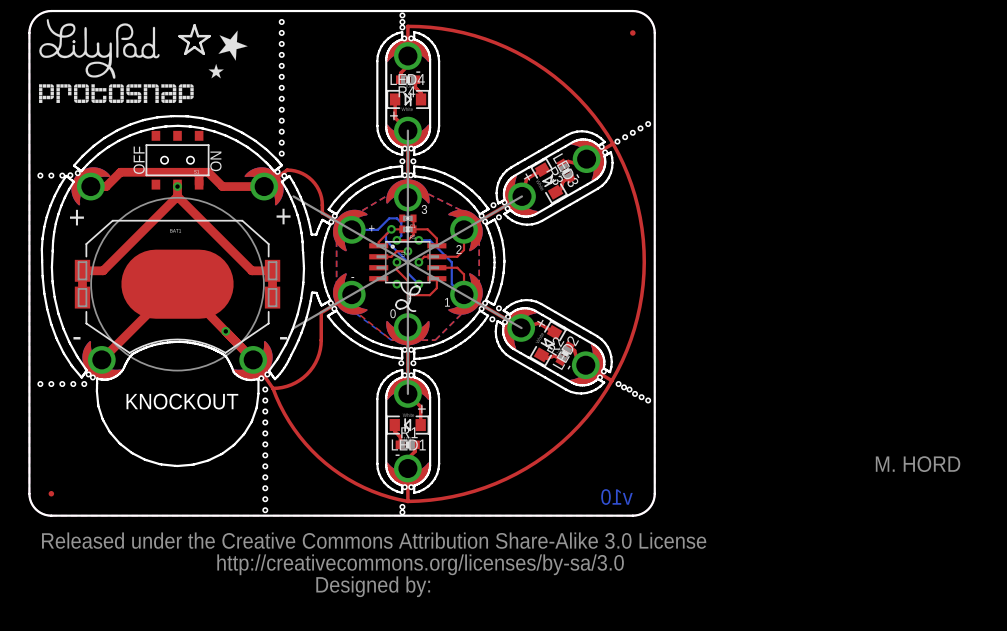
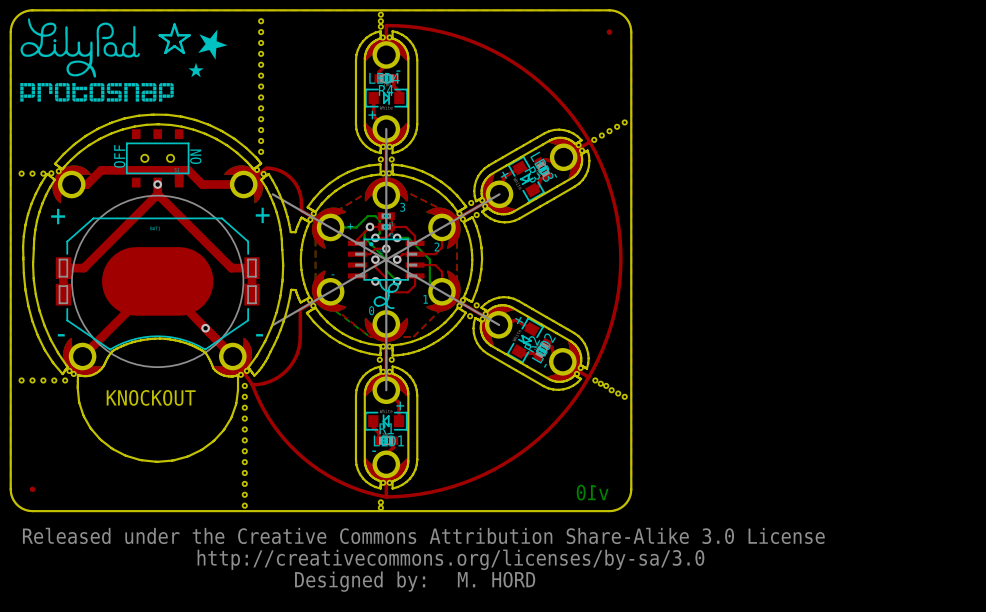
text: M. HORD (918, 464) -> none
text: none -> M. HORD (496, 579)

